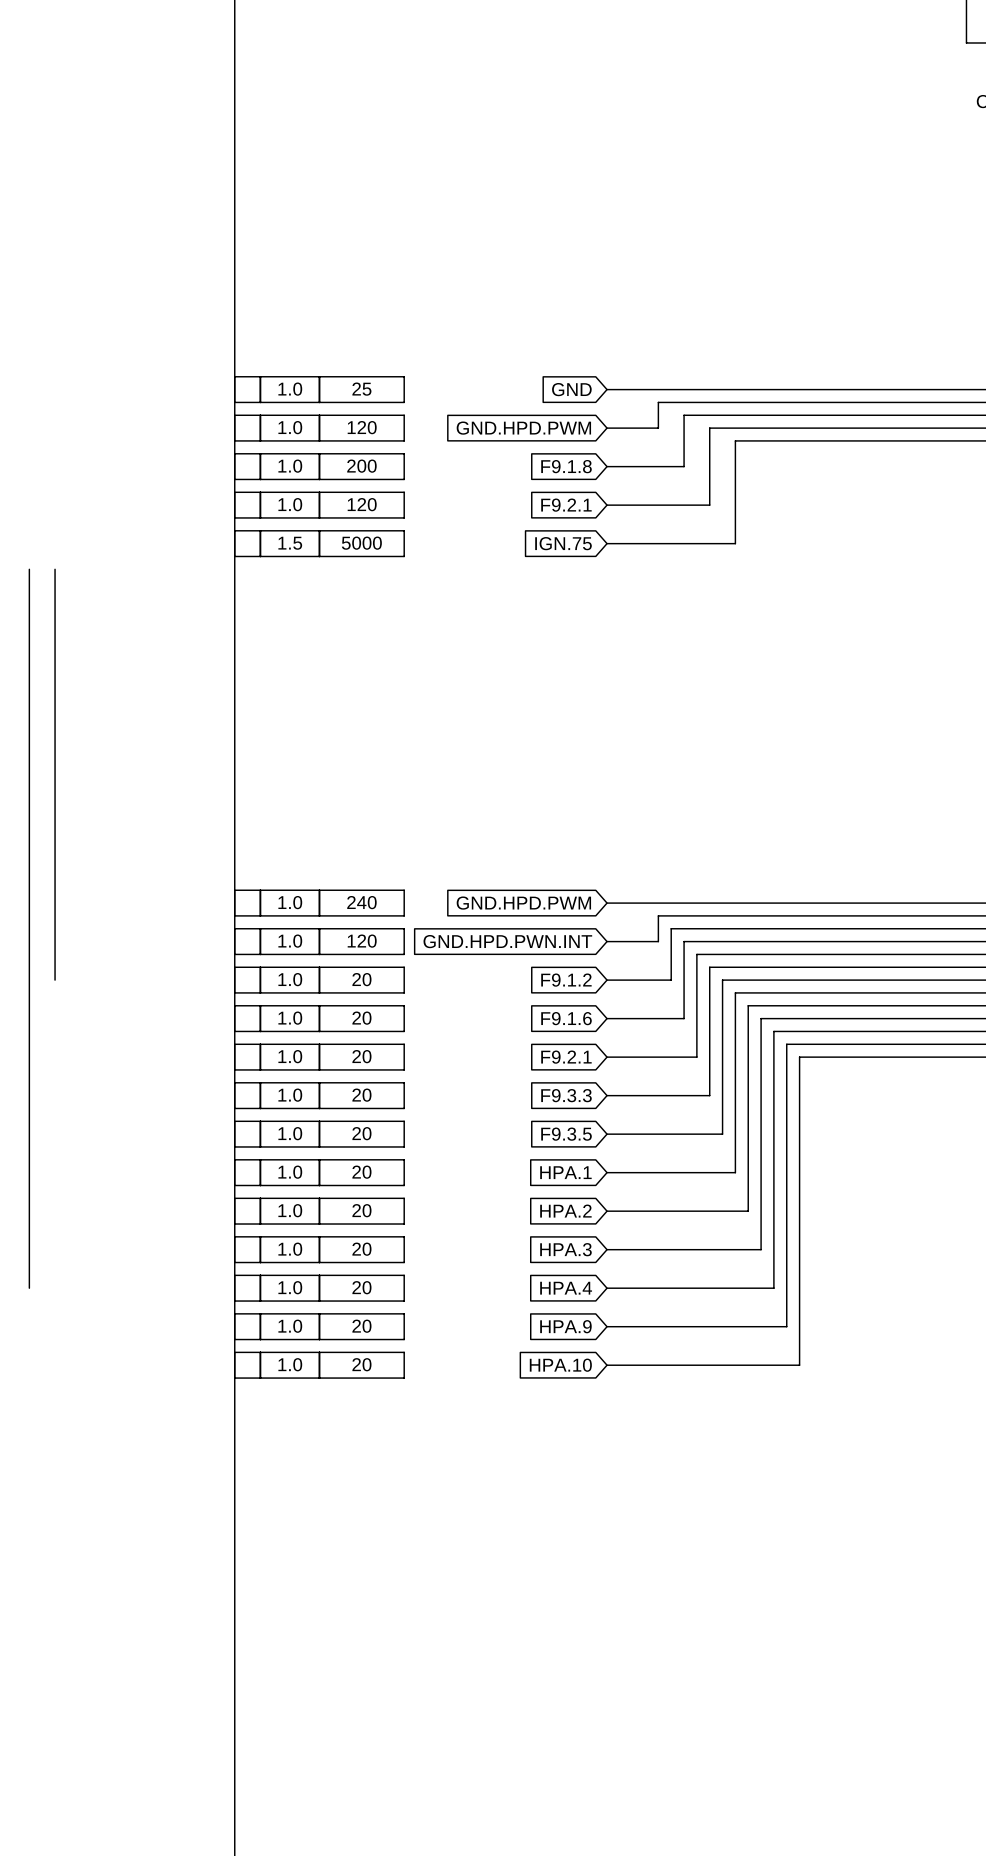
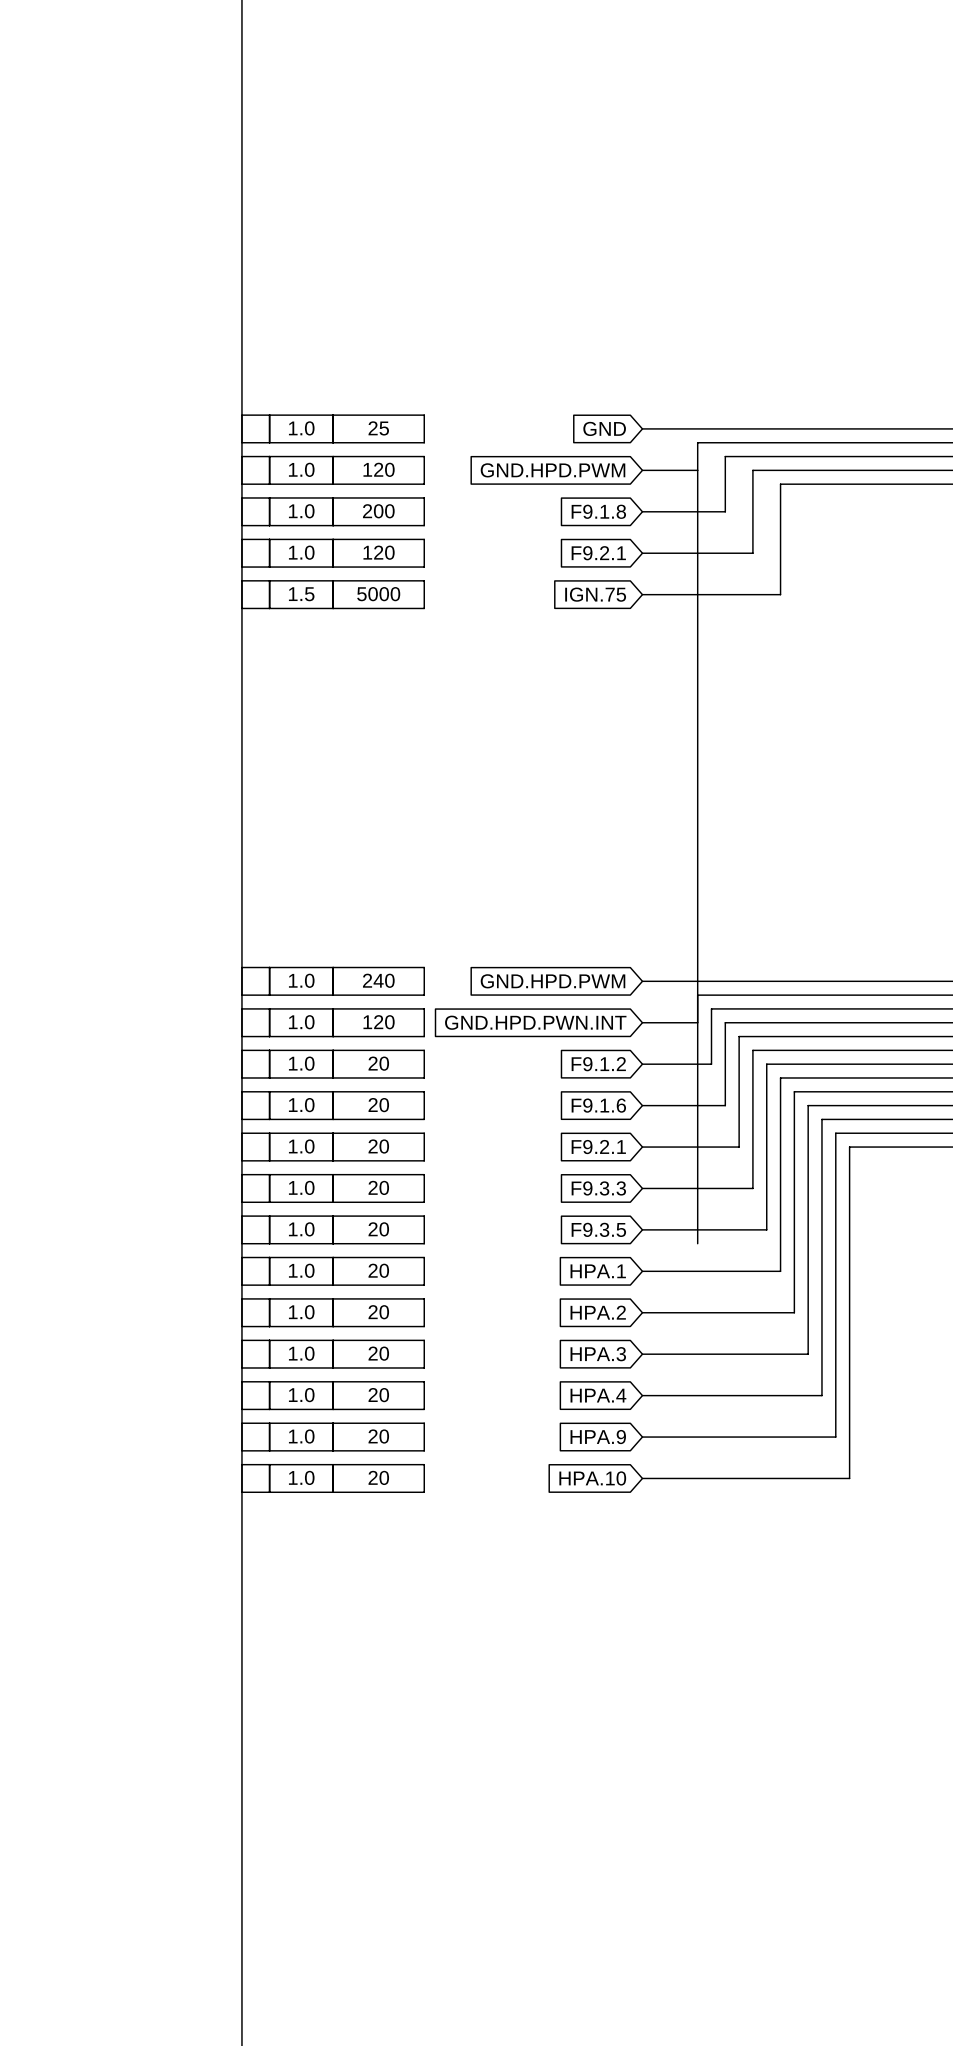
bus: none -> (697, 470) (697, 1243)
bus: (29, 569) (29, 1288) -> none
bus: (55, 569) (55, 980) -> none

